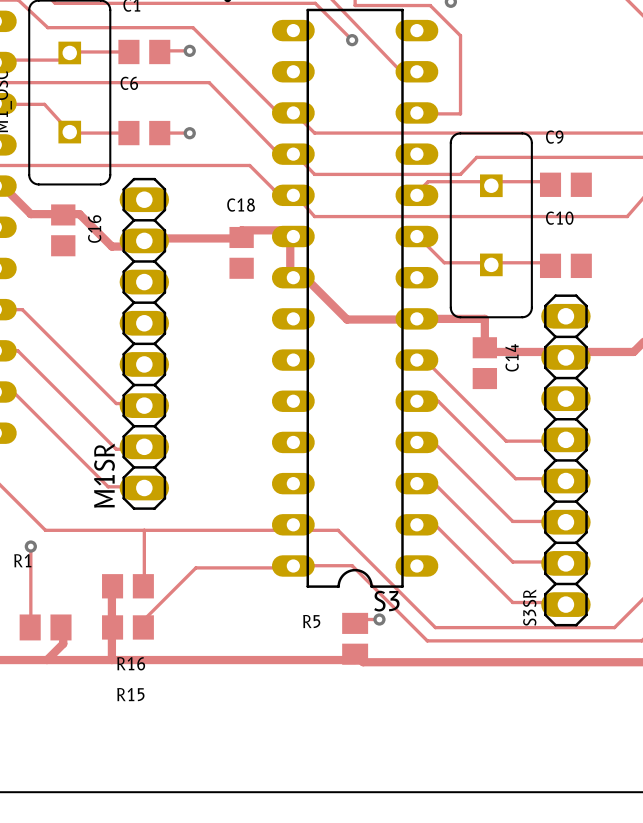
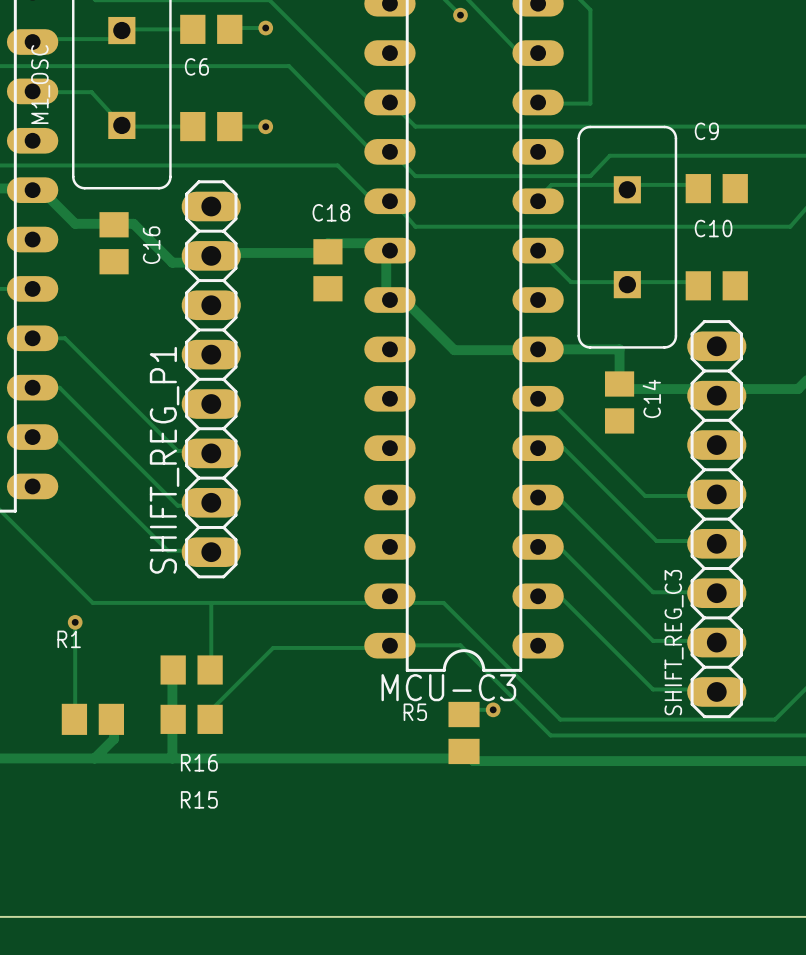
M1SR name: M1SR (104, 475) -> SHIFT_REG_P1 (164, 460)
S3 name: S3 (386, 601) -> MCU-C3 (448, 687)
S3SR name: S3SR (529, 607) -> SHIFT_REG_C3 (674, 642)

